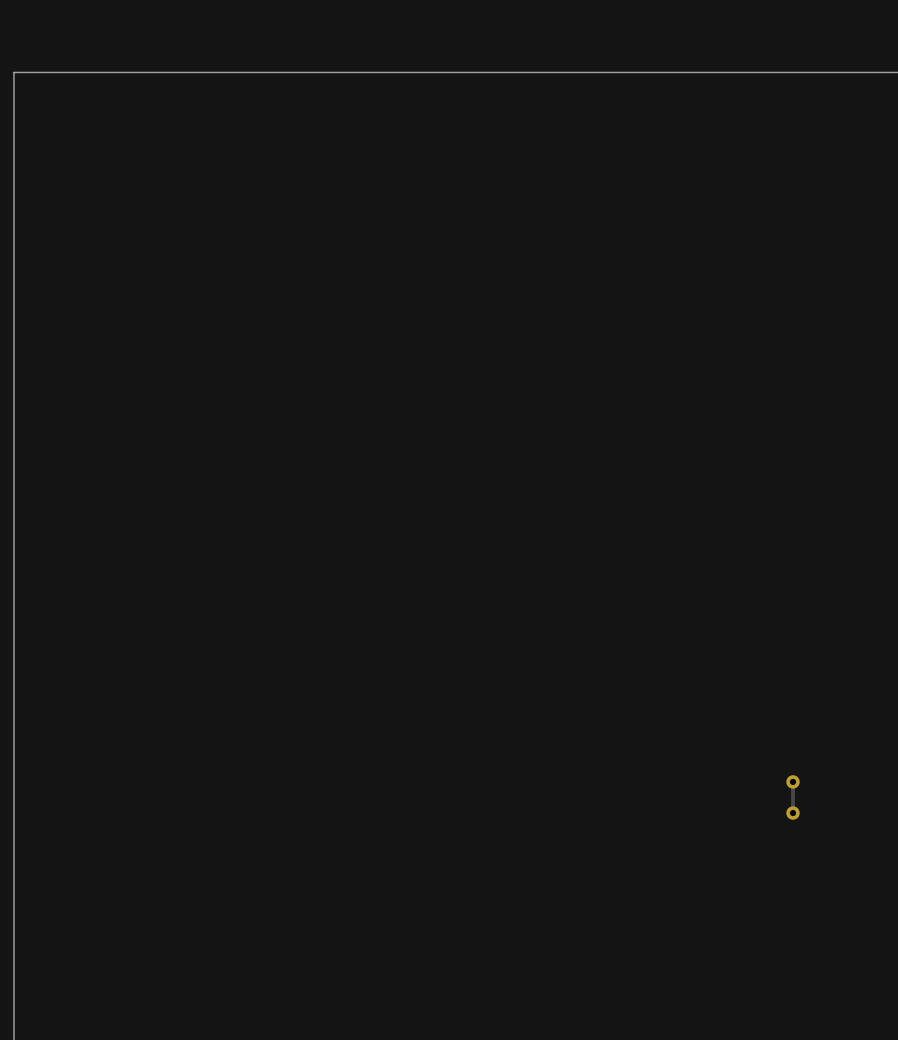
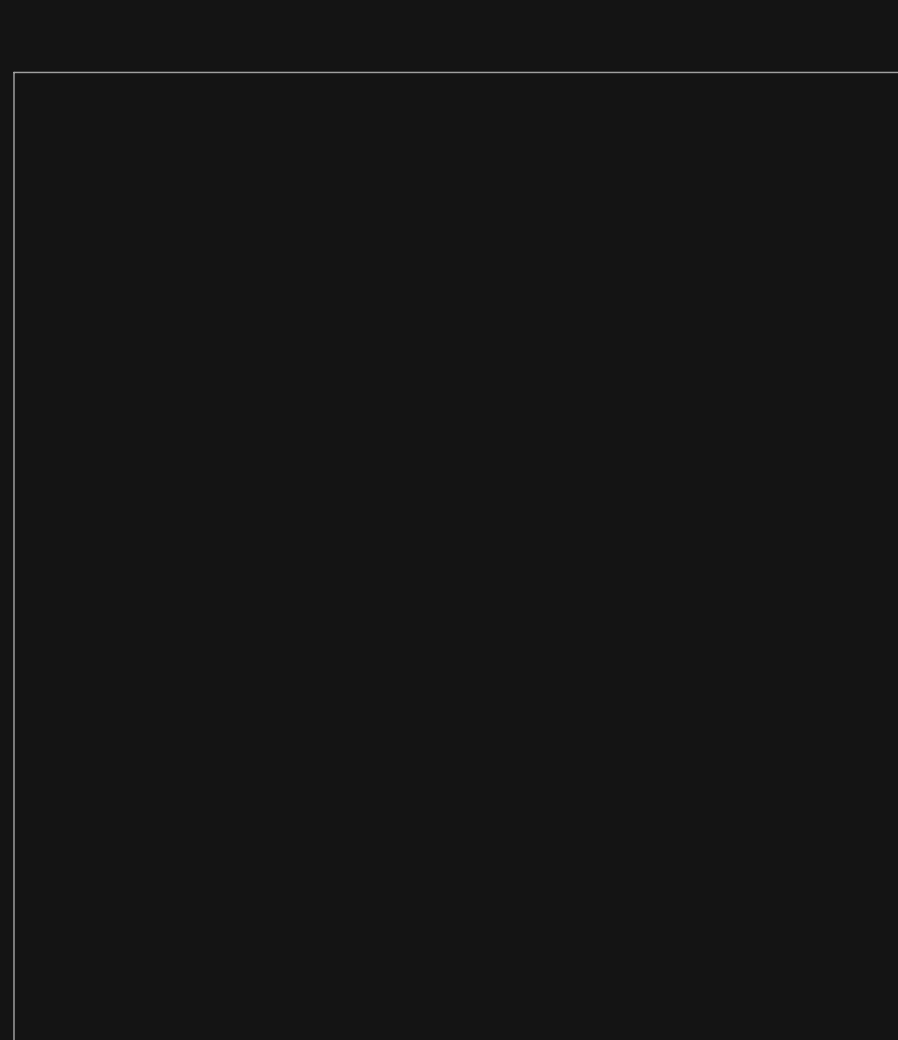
track: (793, 781) (793, 813) -> none
via: (793, 781) -> none
via: (793, 813) -> none

